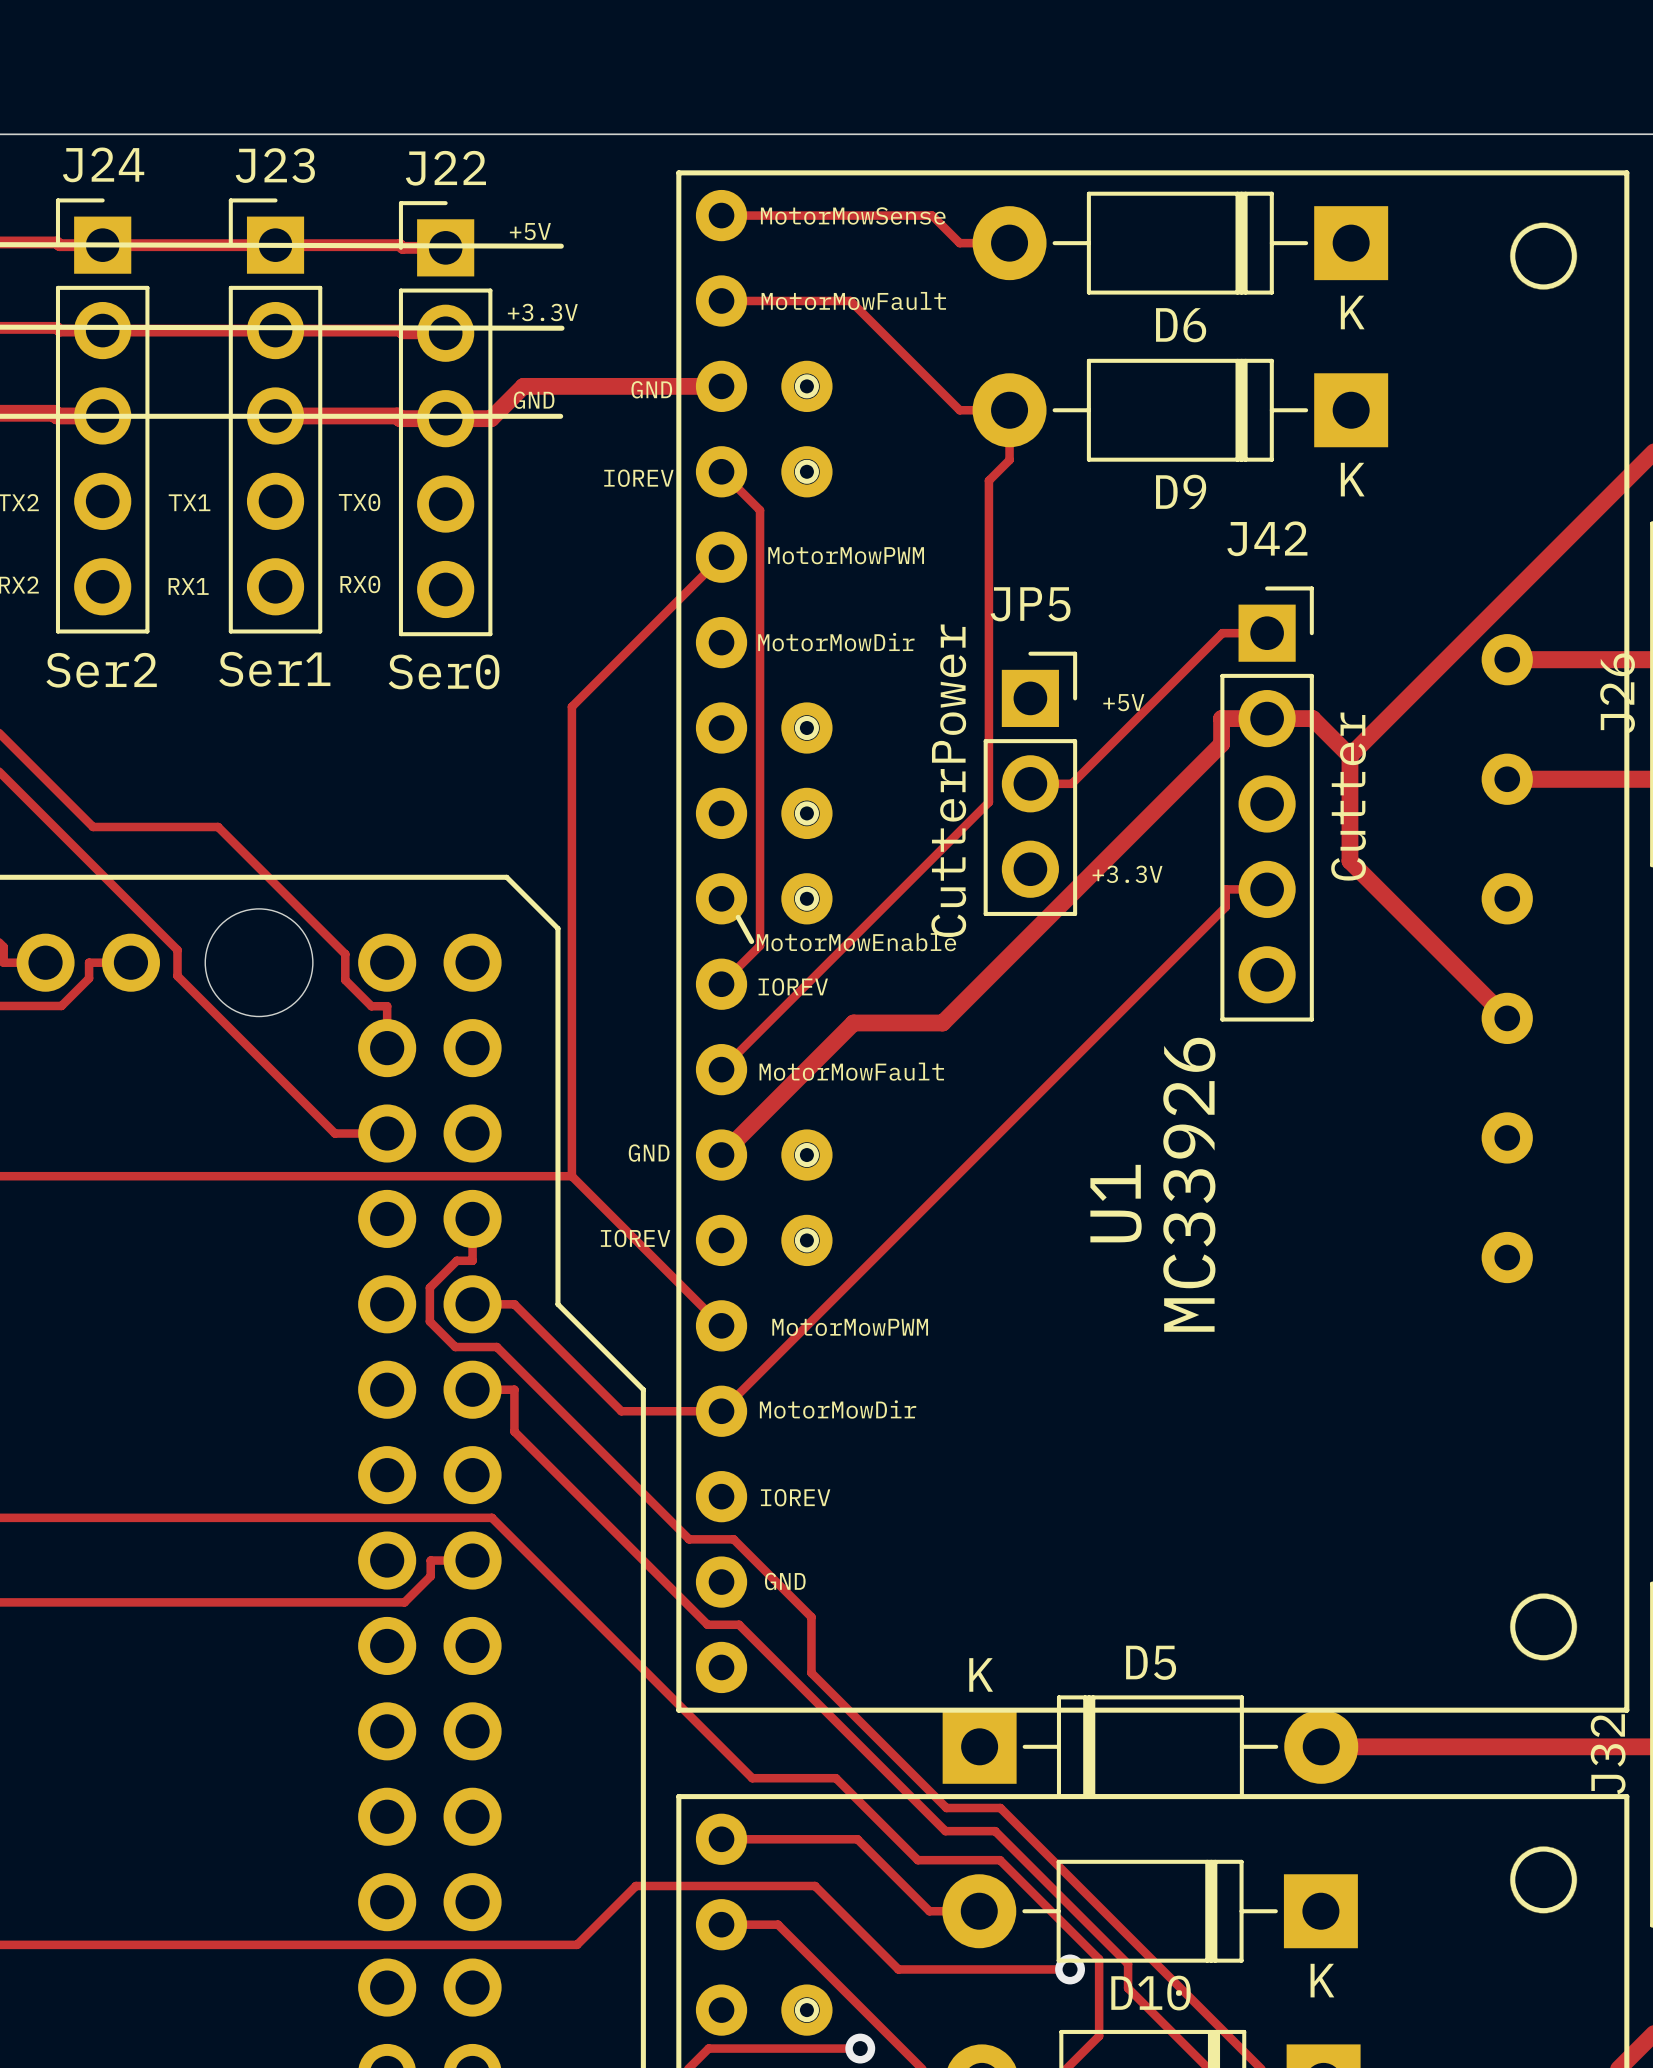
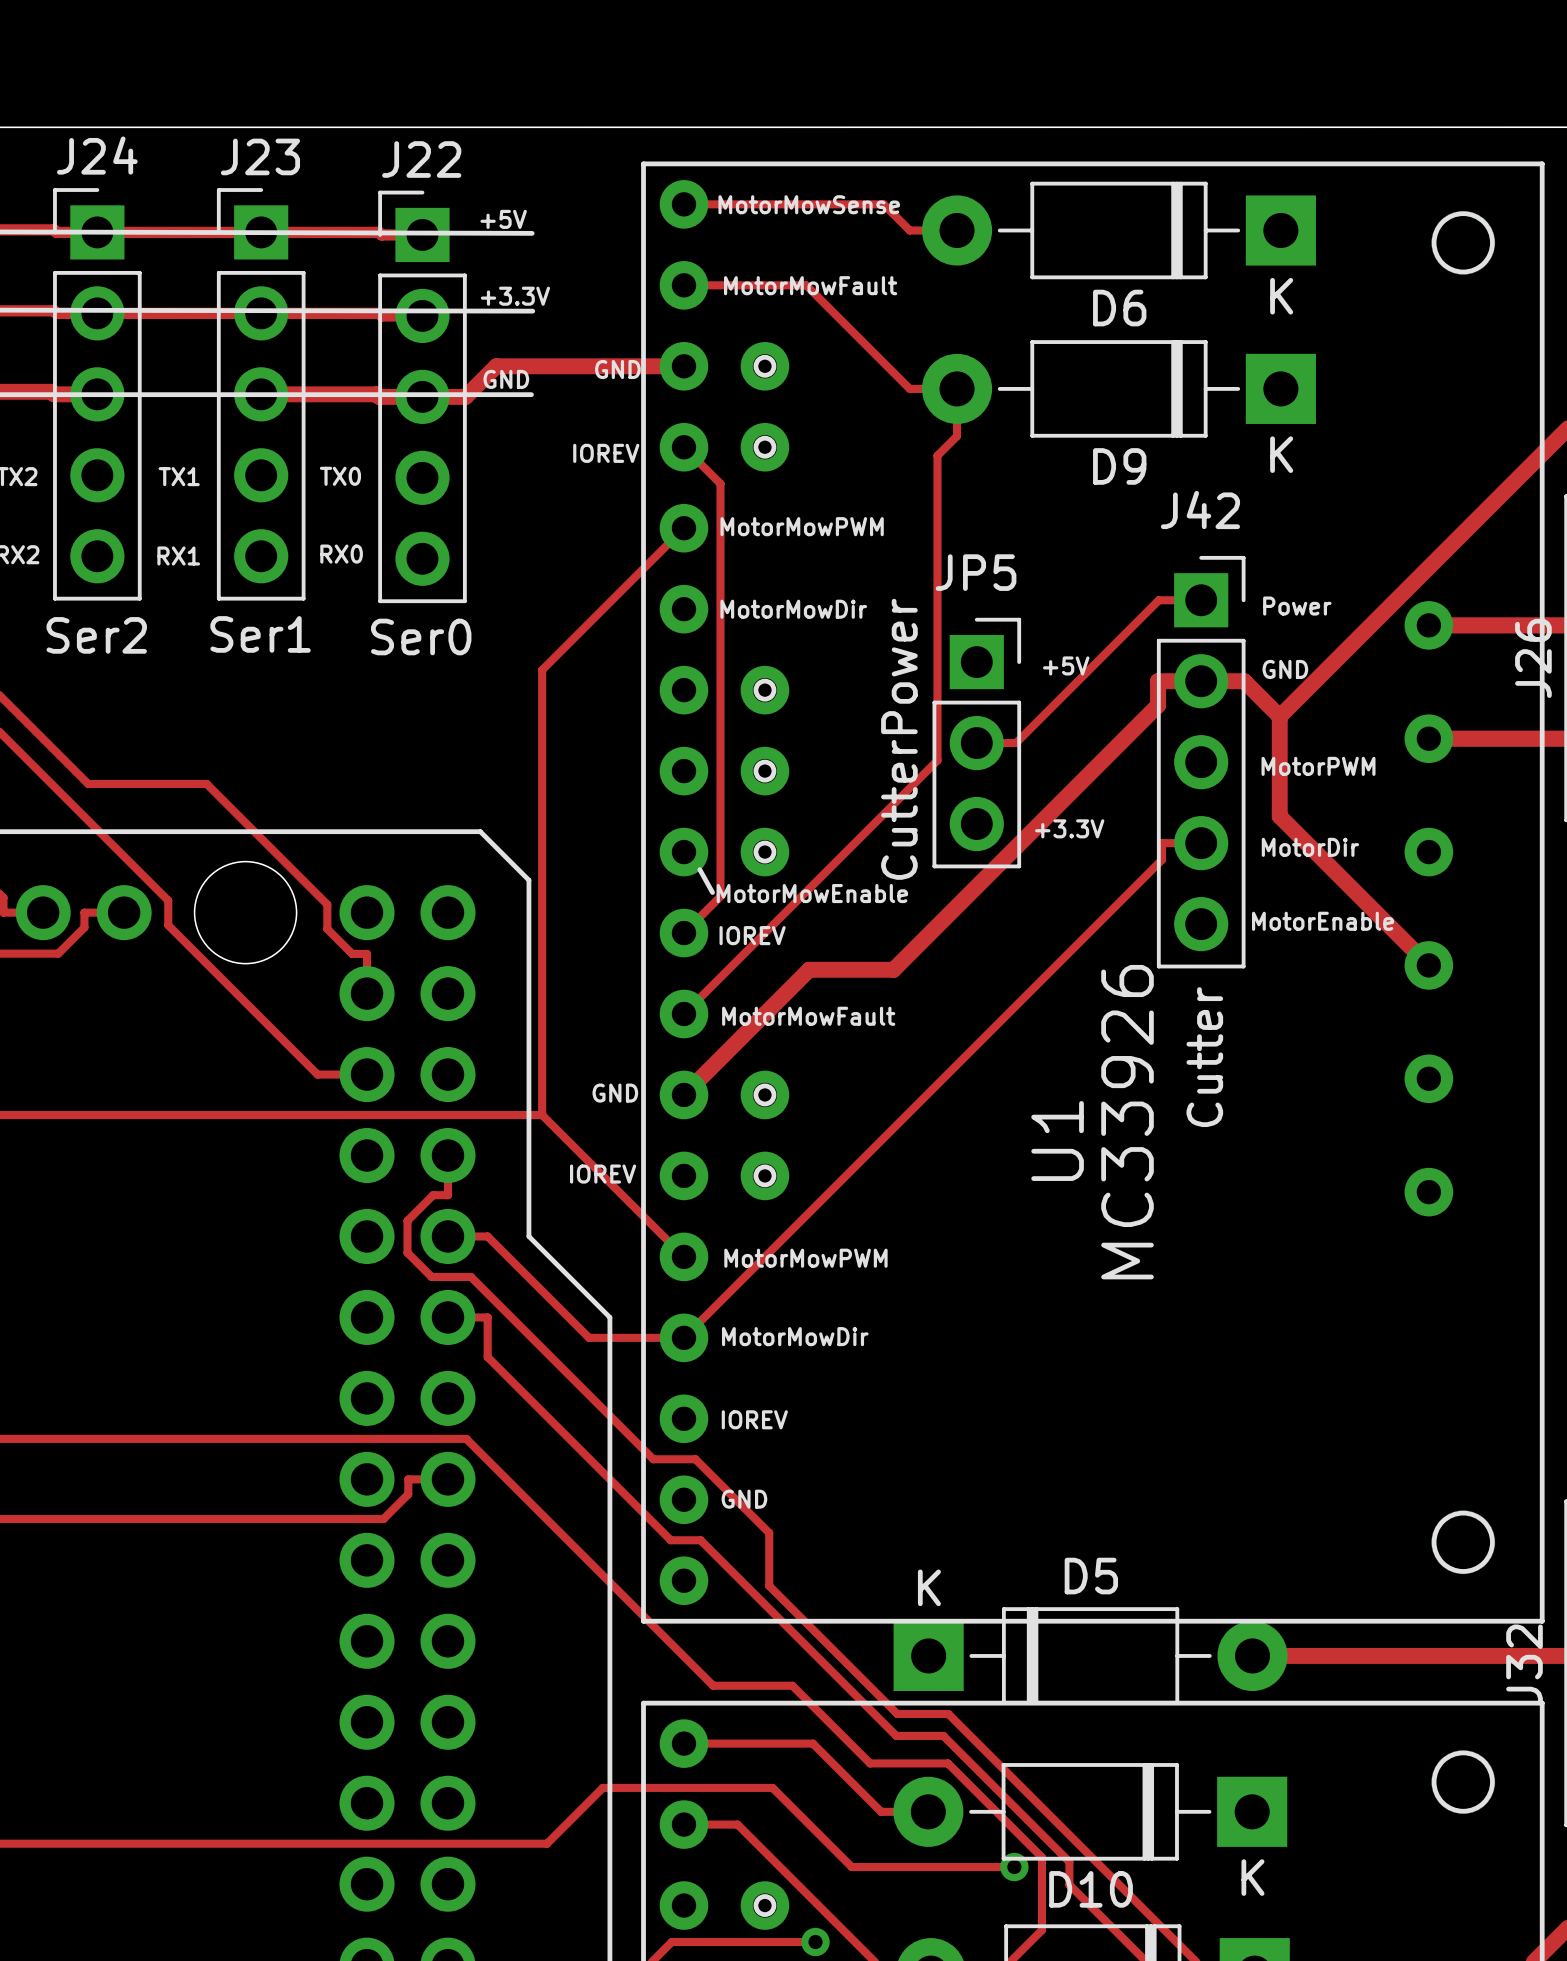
text: none -> Power (1297, 606)
text: none -> GND (1285, 669)
J42 value position: Cutter (1348, 796) -> Cutter (1204, 1057)
text: none -> MotorPWM (1318, 766)
text: none -> MotorDir (1310, 847)
text: none -> MotorEnable (1323, 921)

